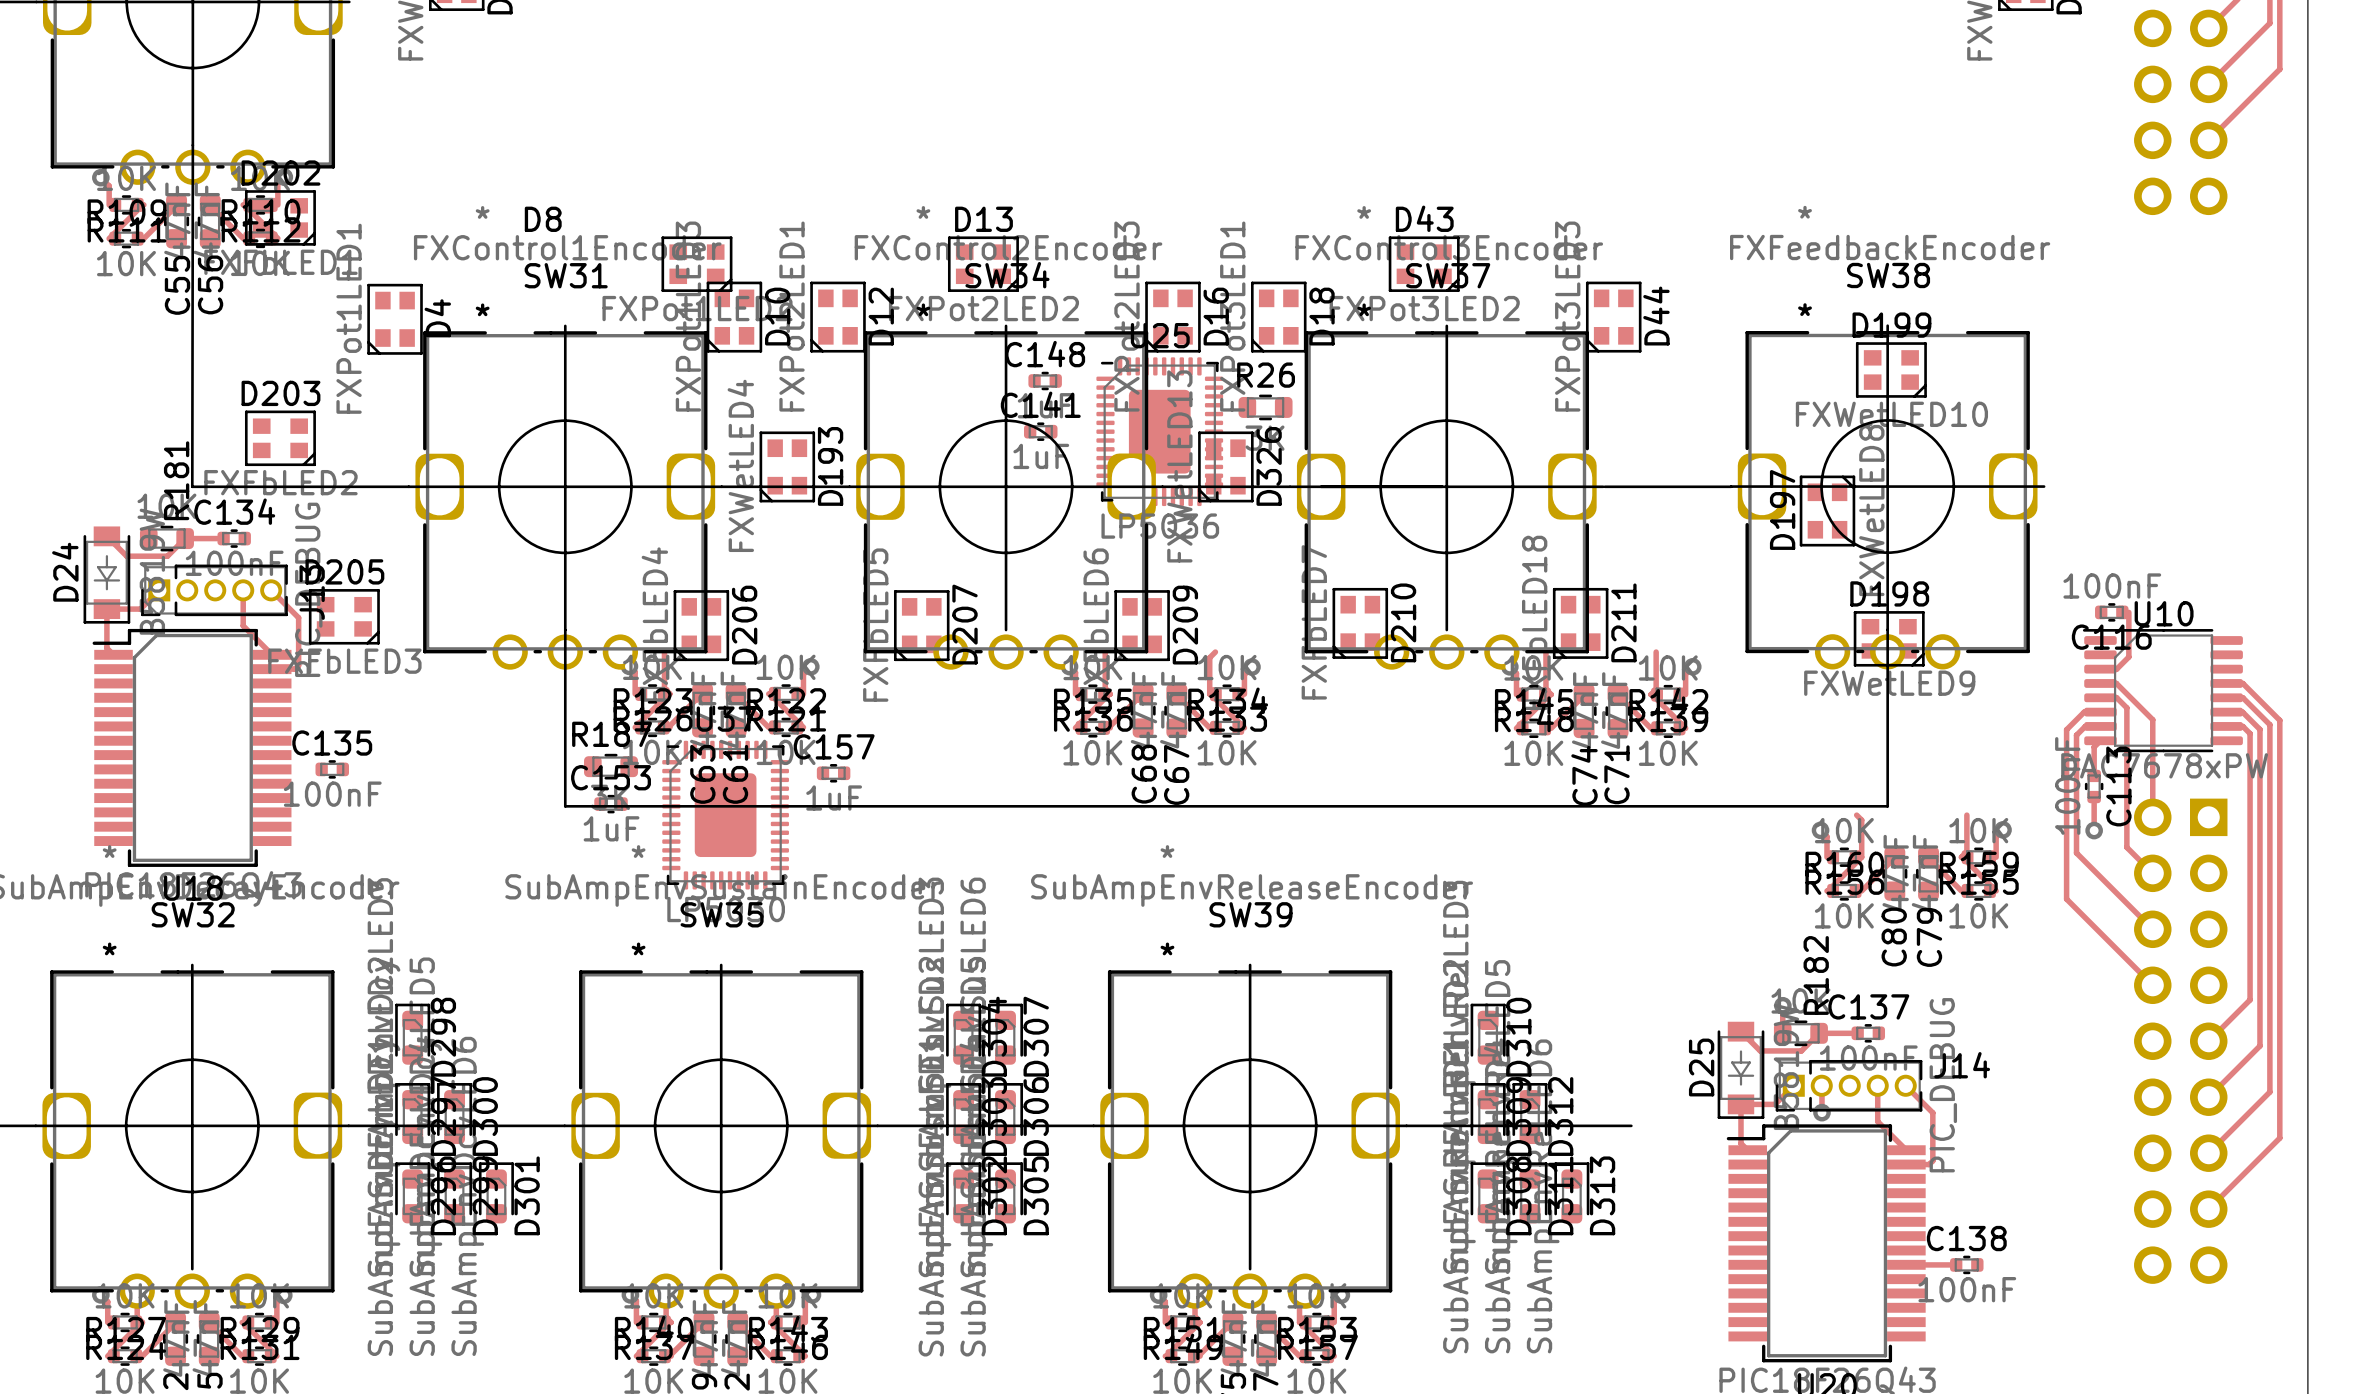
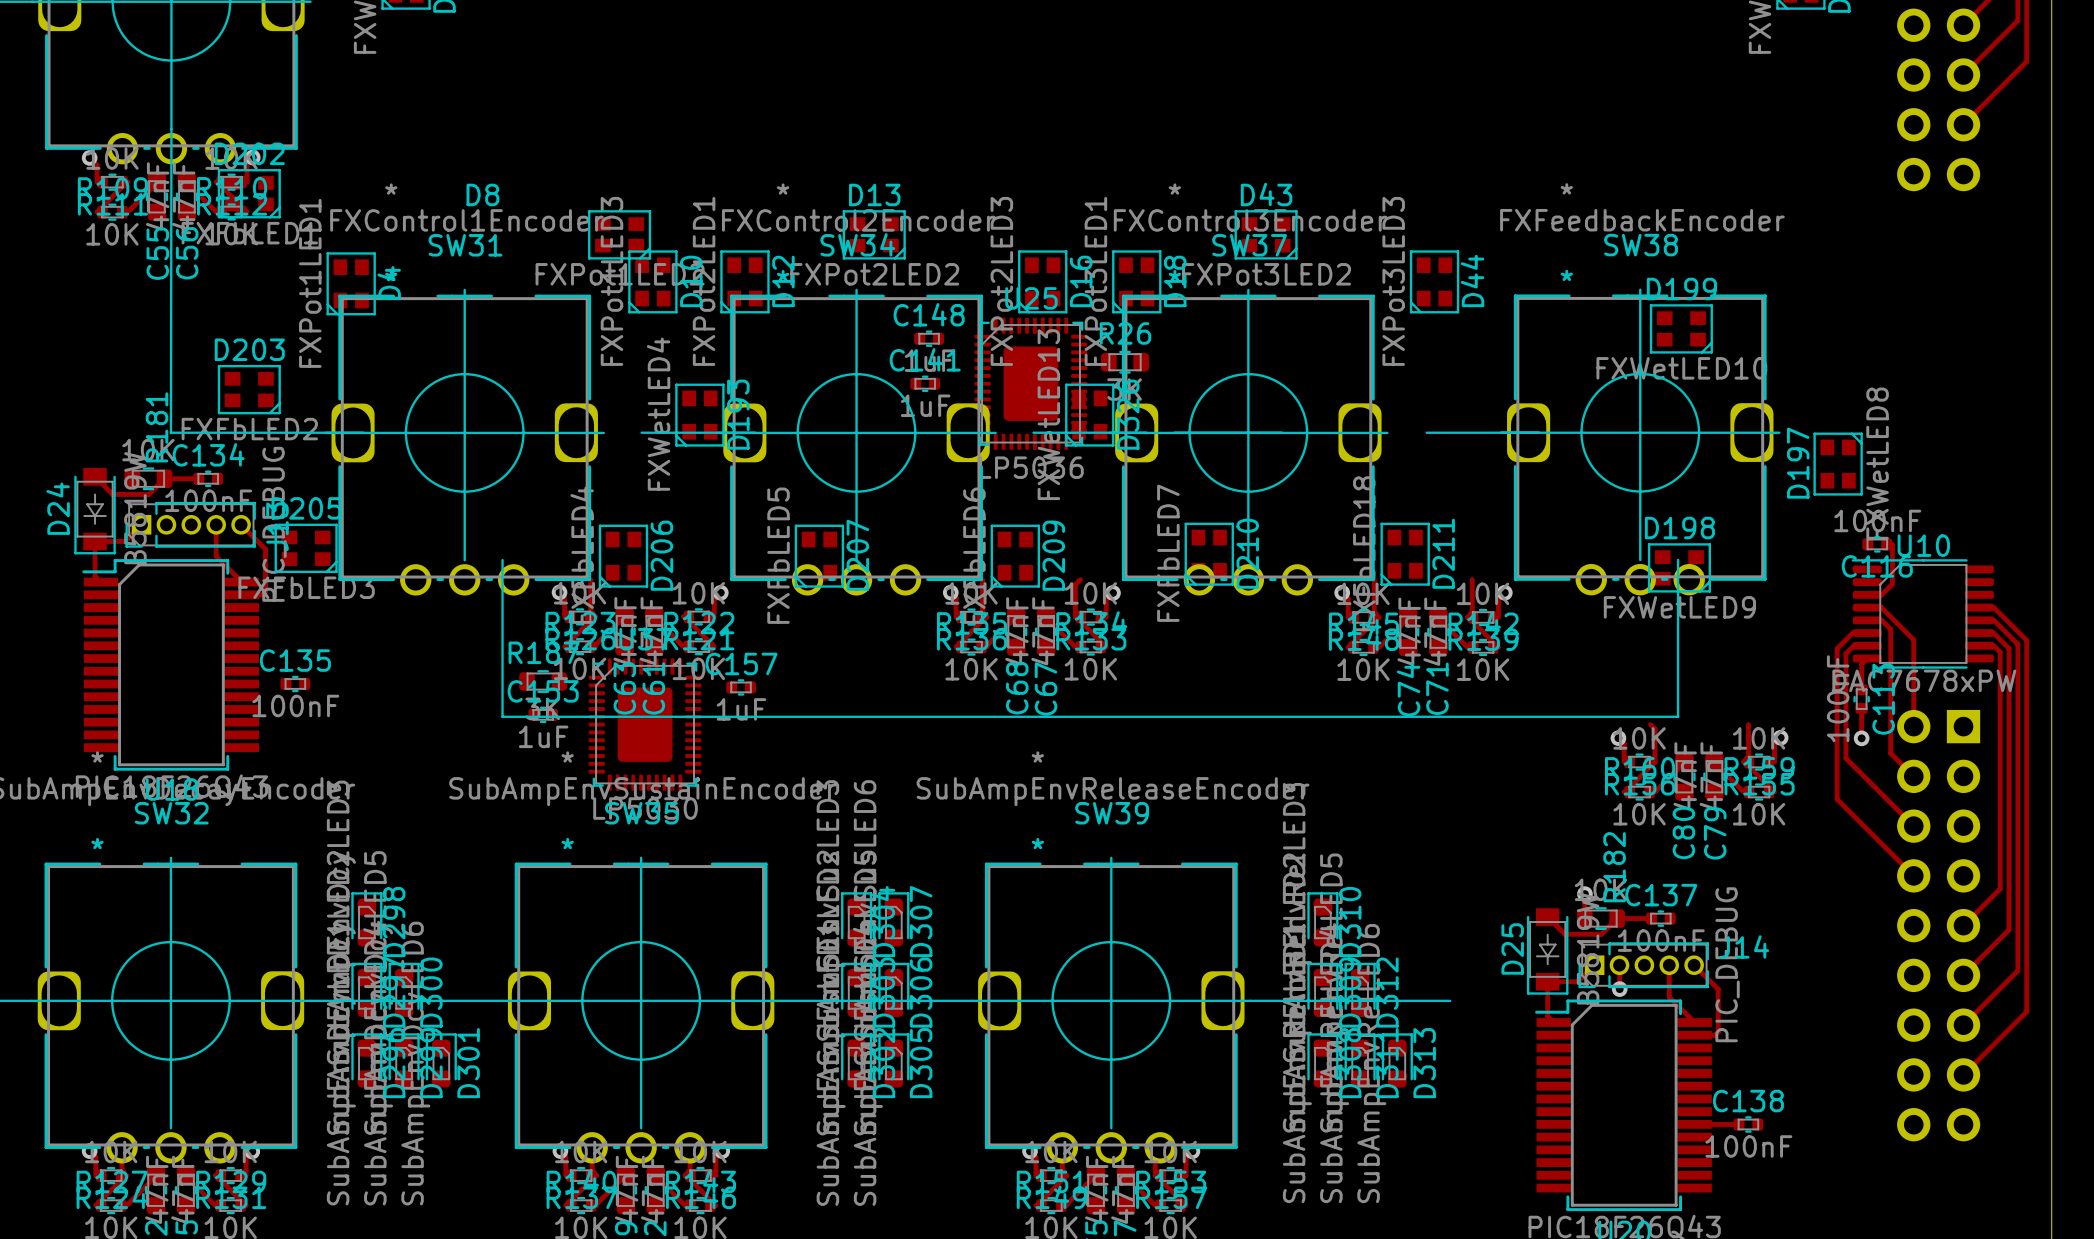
SW38 position: (1887, 496) -> (1640, 441)
SW31 position: (565, 497) -> (464, 442)
SW34 position: (1006, 497) -> (856, 442)
SW37 position: (1446, 497) -> (1248, 442)
D197 position: (1827, 511) -> (1838, 464)

